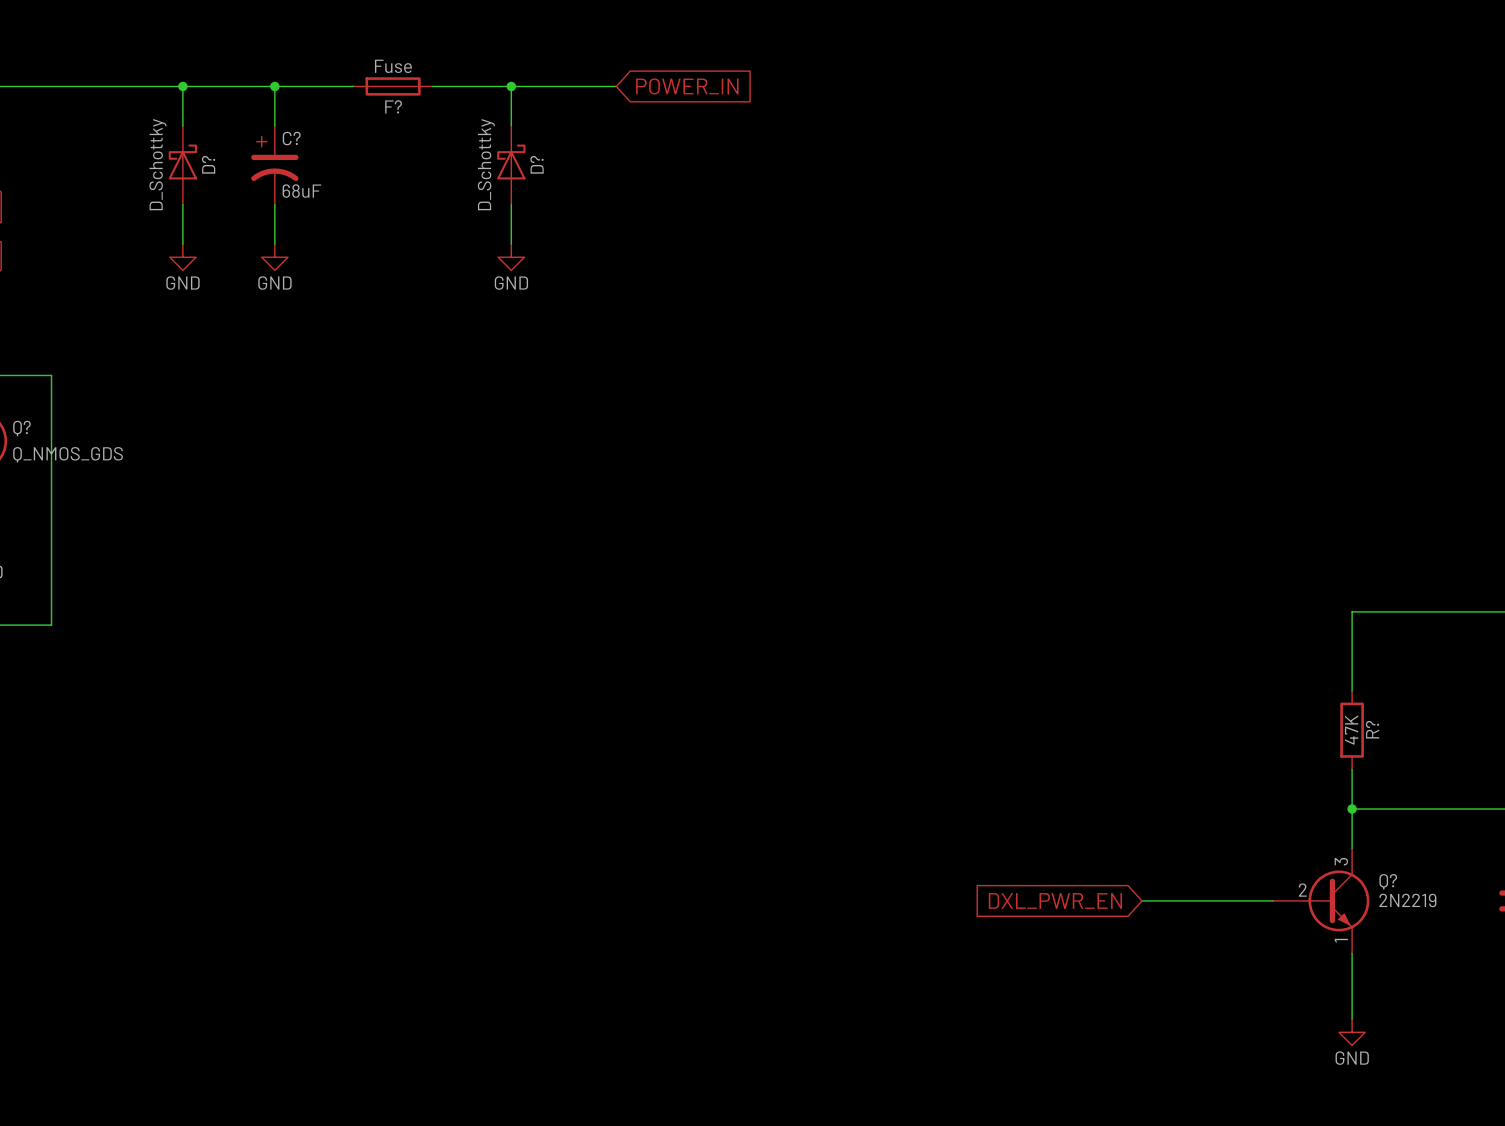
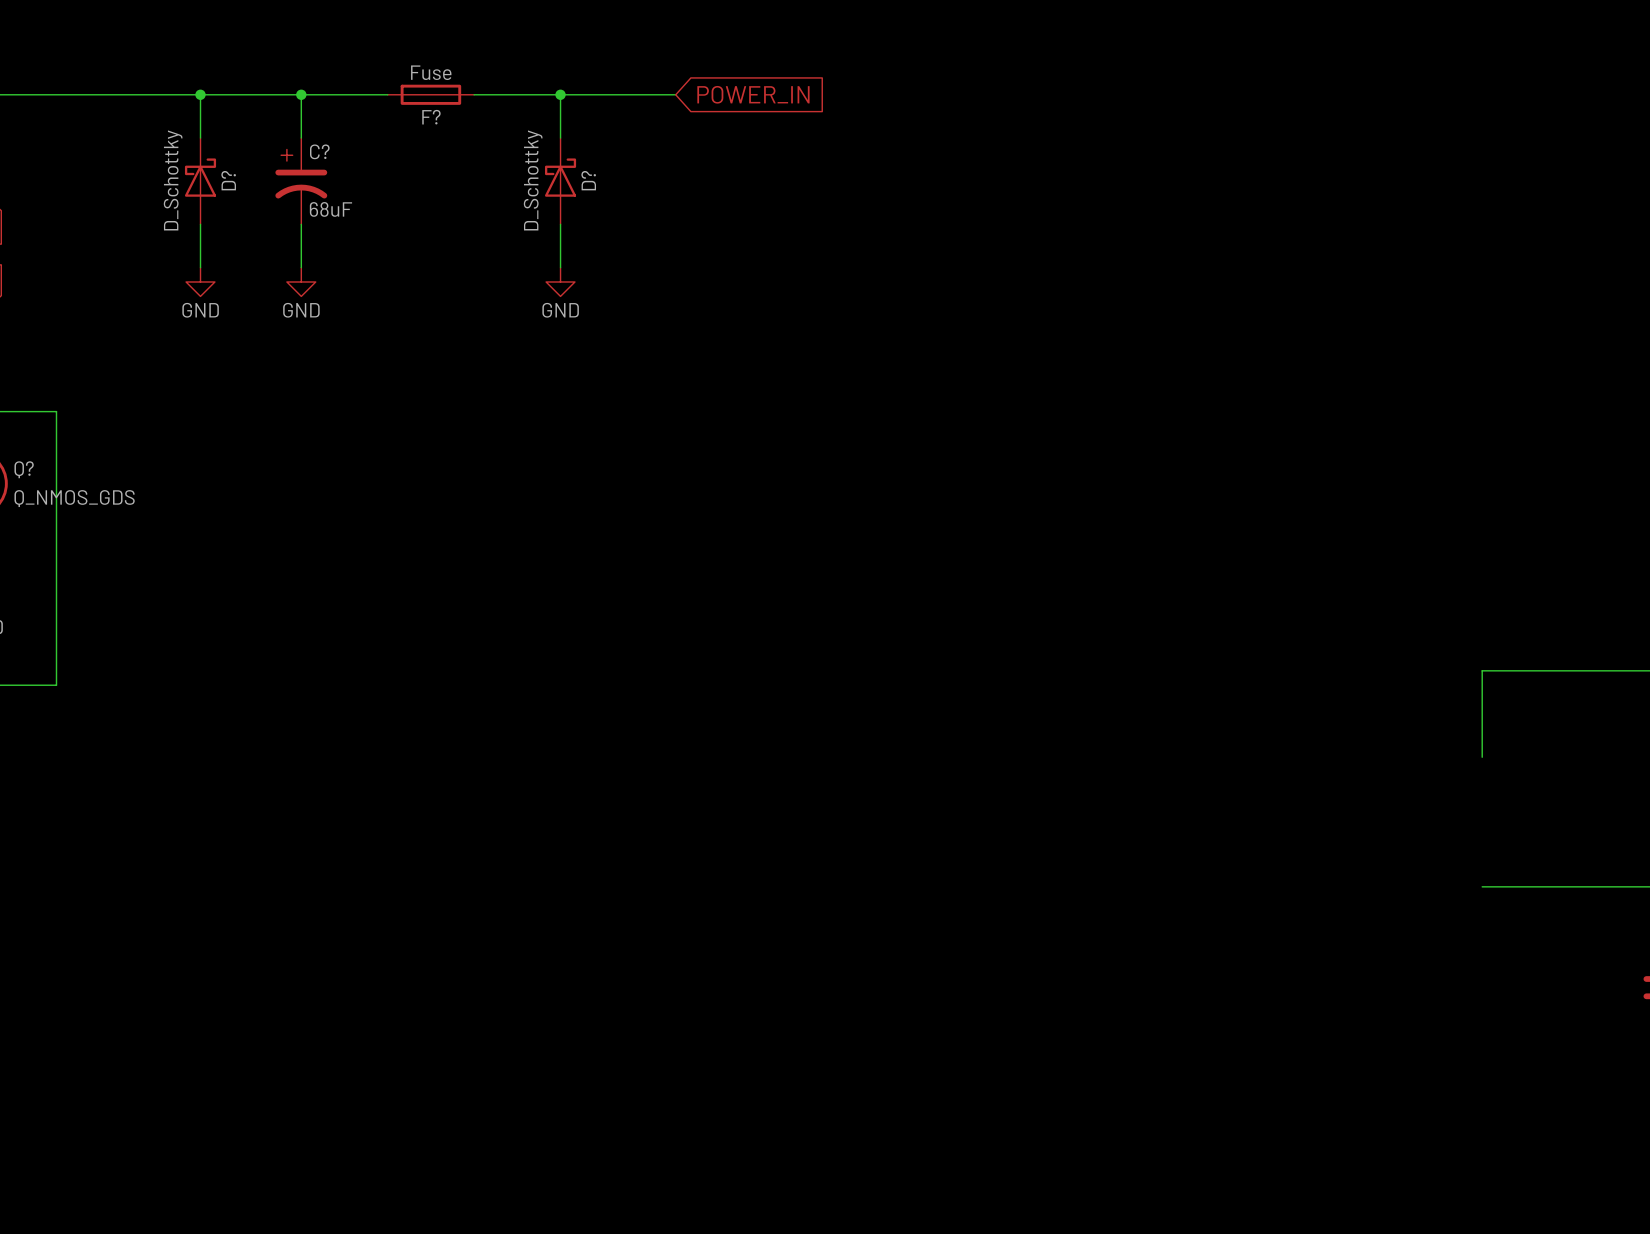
R?: 47K (1352, 730) -> none
wire: (1352, 769) (1352, 848) -> none
junction: (1352, 809) -> none
global label: DXL_PWR_EN (1055, 900) -> none
wire: (1141, 900) (1273, 900) -> none
Q?: 2N2219 (1321, 900) -> none
wire: (1352, 953) (1352, 1019) -> none
power symbol: GND (1352, 1032) -> none

